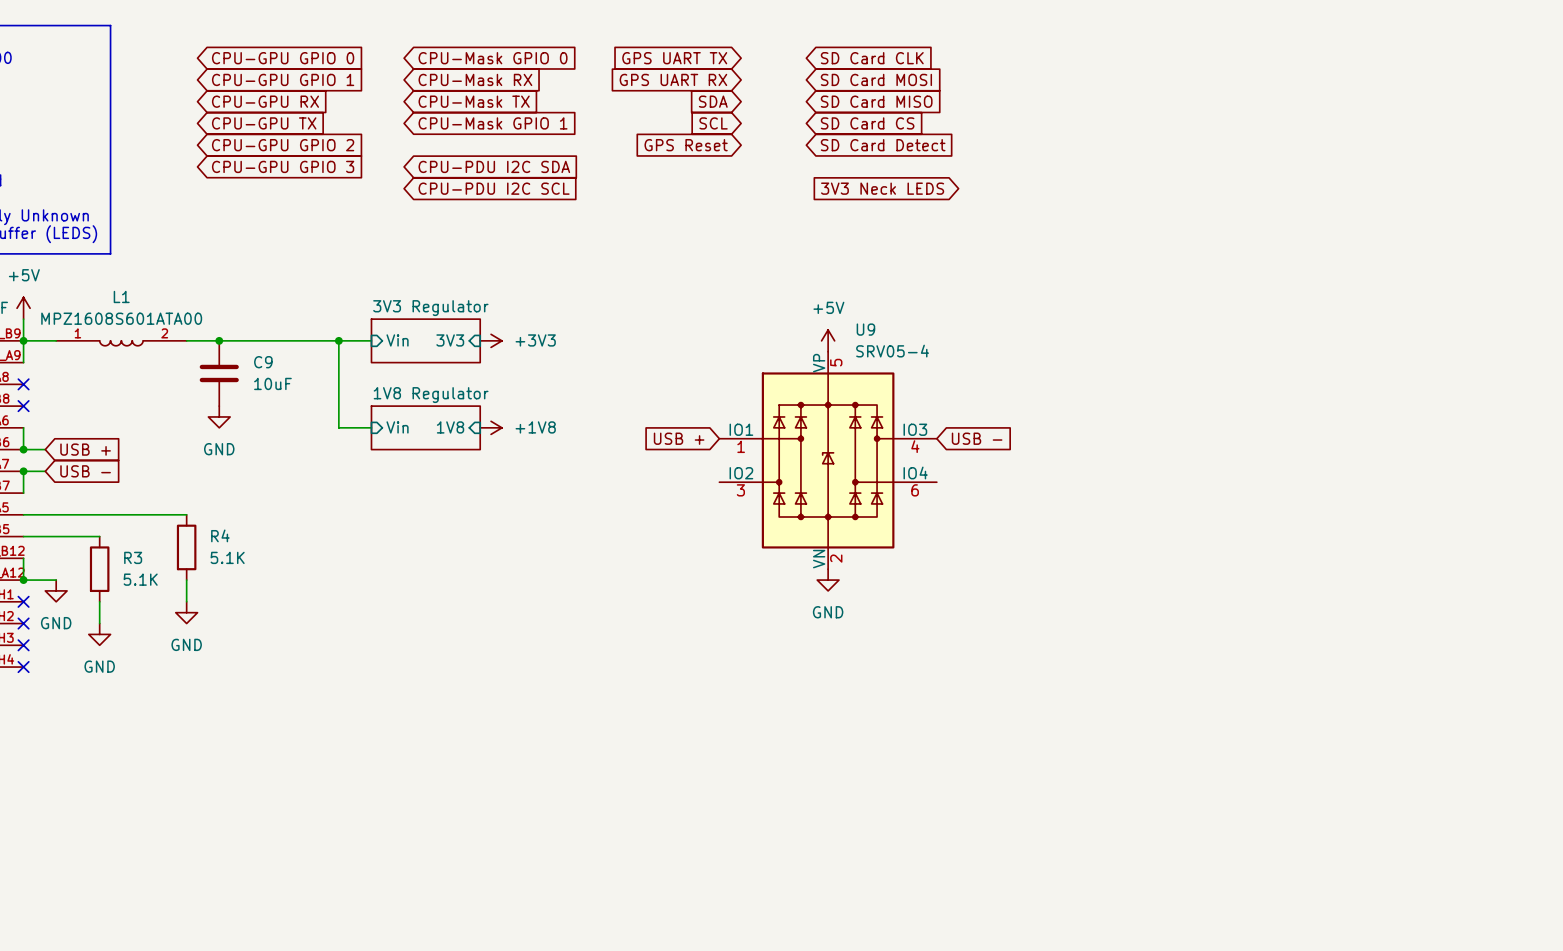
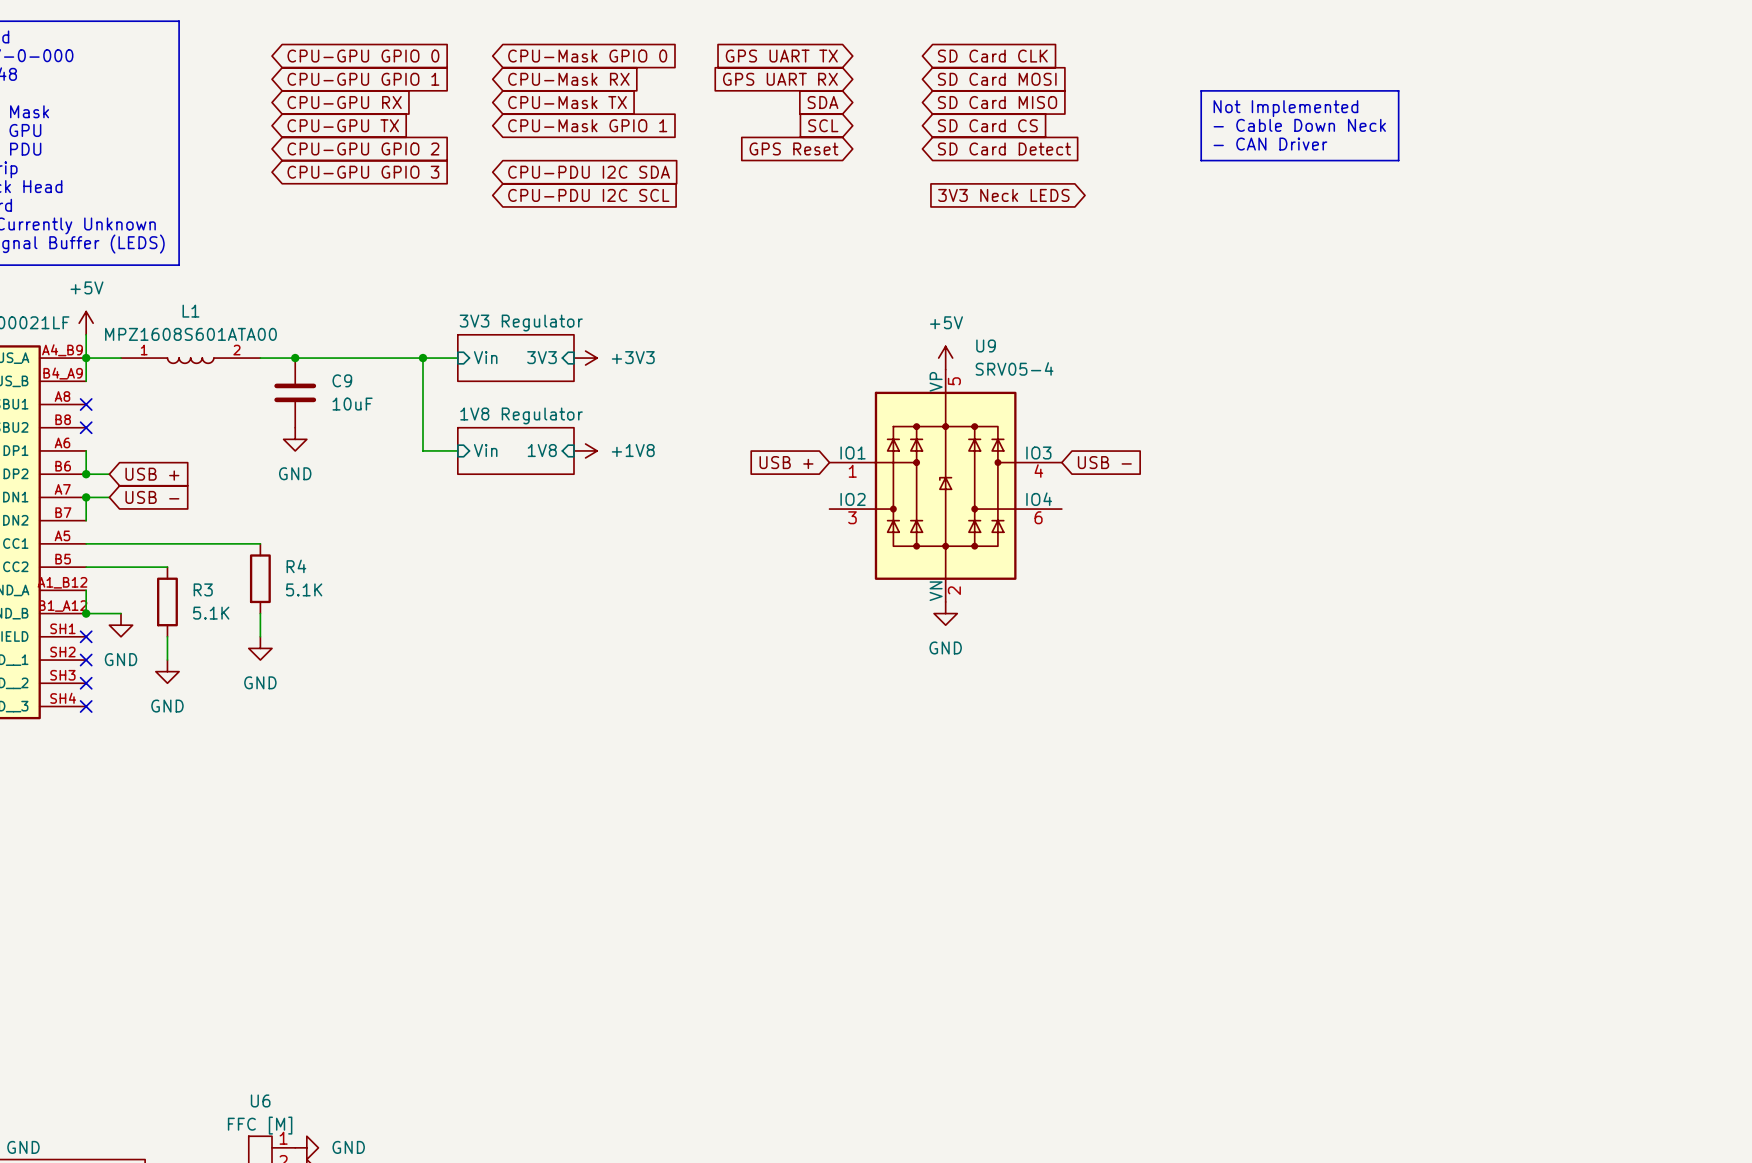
line: none -> (1201, 90) (1398, 90) (1398, 160) (1201, 160) (1201, 90)
text: none -> Not Implemented (1285, 108)
text: none -> - Cable Down Neck (1299, 125)
text: none -> - CAN Driver (1270, 144)

